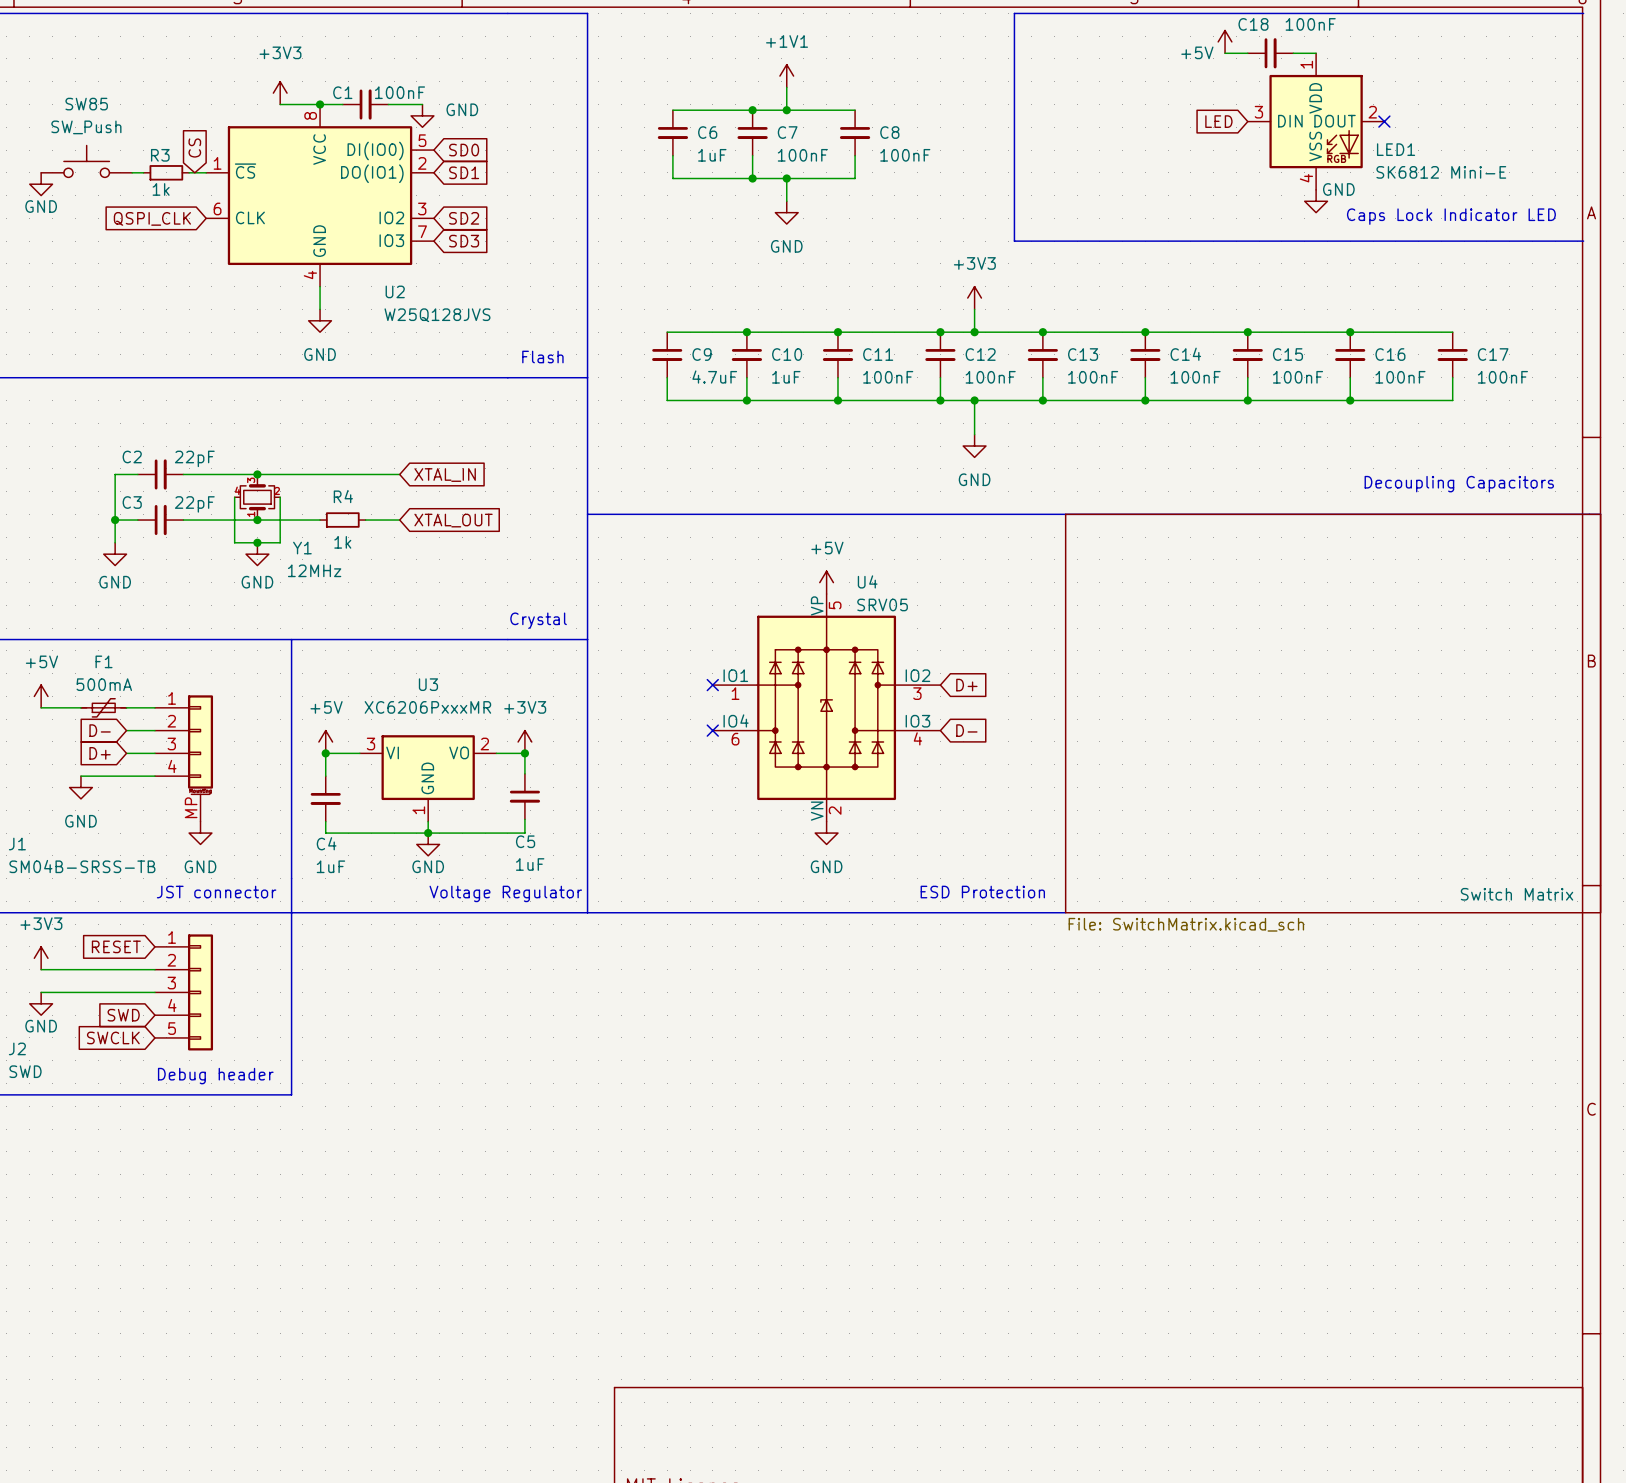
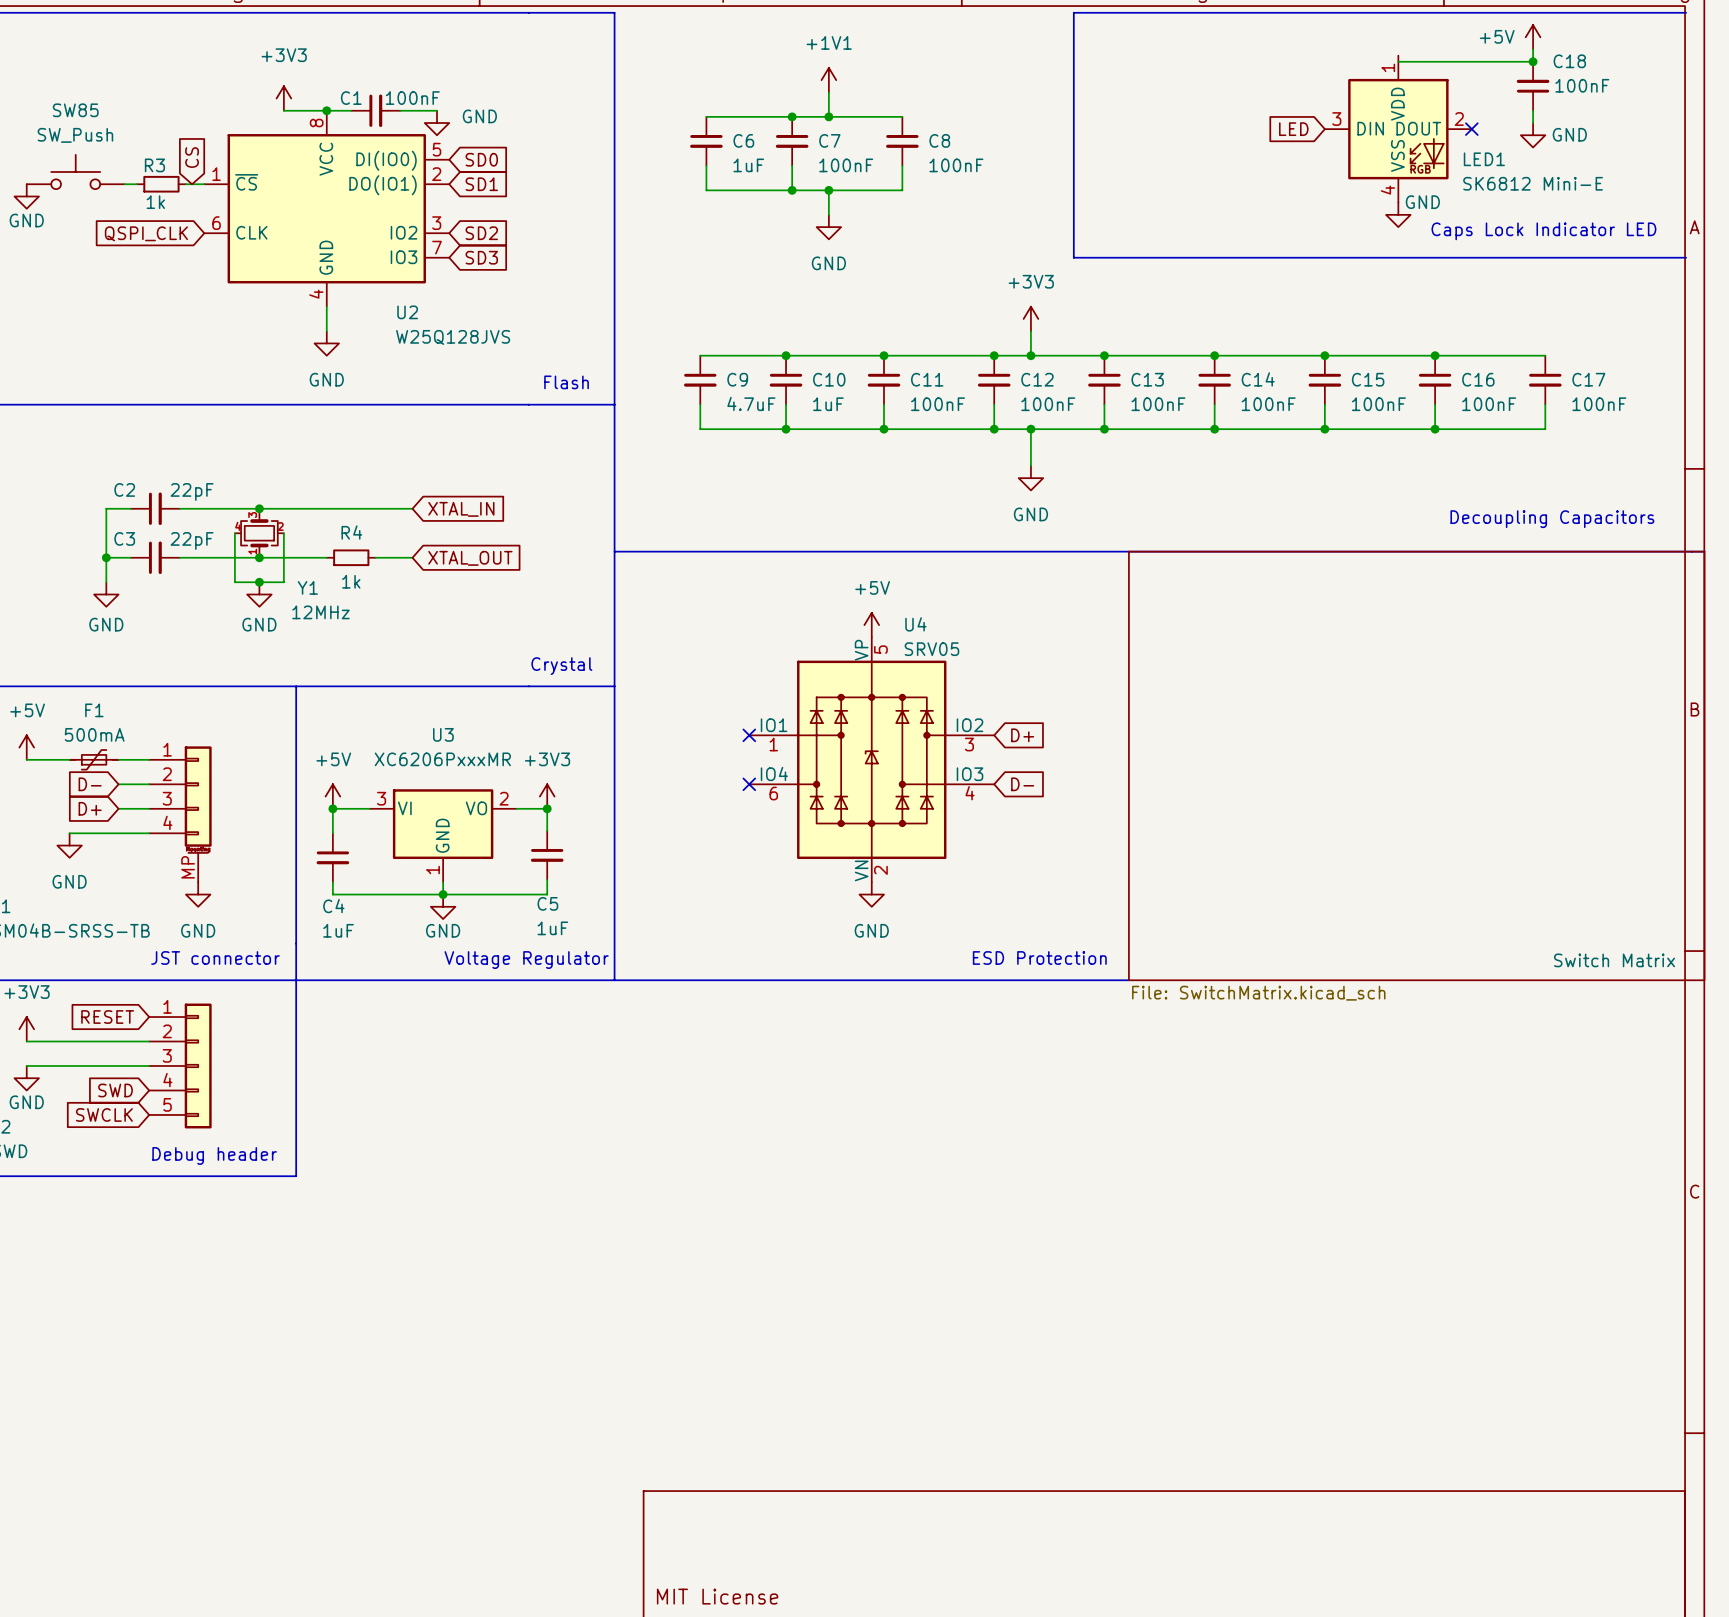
C18 name position: C18 (1253, 24) -> C18 (1569, 61)
C18 value position: 100nF (1310, 24) -> 100nF (1582, 85)
power symbol position: +5V (1225, 41) -> +5V (1533, 37)
wire: none -> (1533, 49) (1533, 61) (1398, 61)
power symbol text position: +5V (1197, 52) -> +5V (1497, 36)
wire: (1225, 53) (1247, 53) -> none
C18 rotation: 0° (1270, 53) -> 90° counterclockwise (1533, 86)
C18 position: (1270, 53) -> (1533, 86)
wire: (1293, 53) (1316, 53) -> none
junction: none -> (1533, 61)
wire: none -> (1533, 110) (1533, 123)
power symbol: none -> GND (1533, 135)

